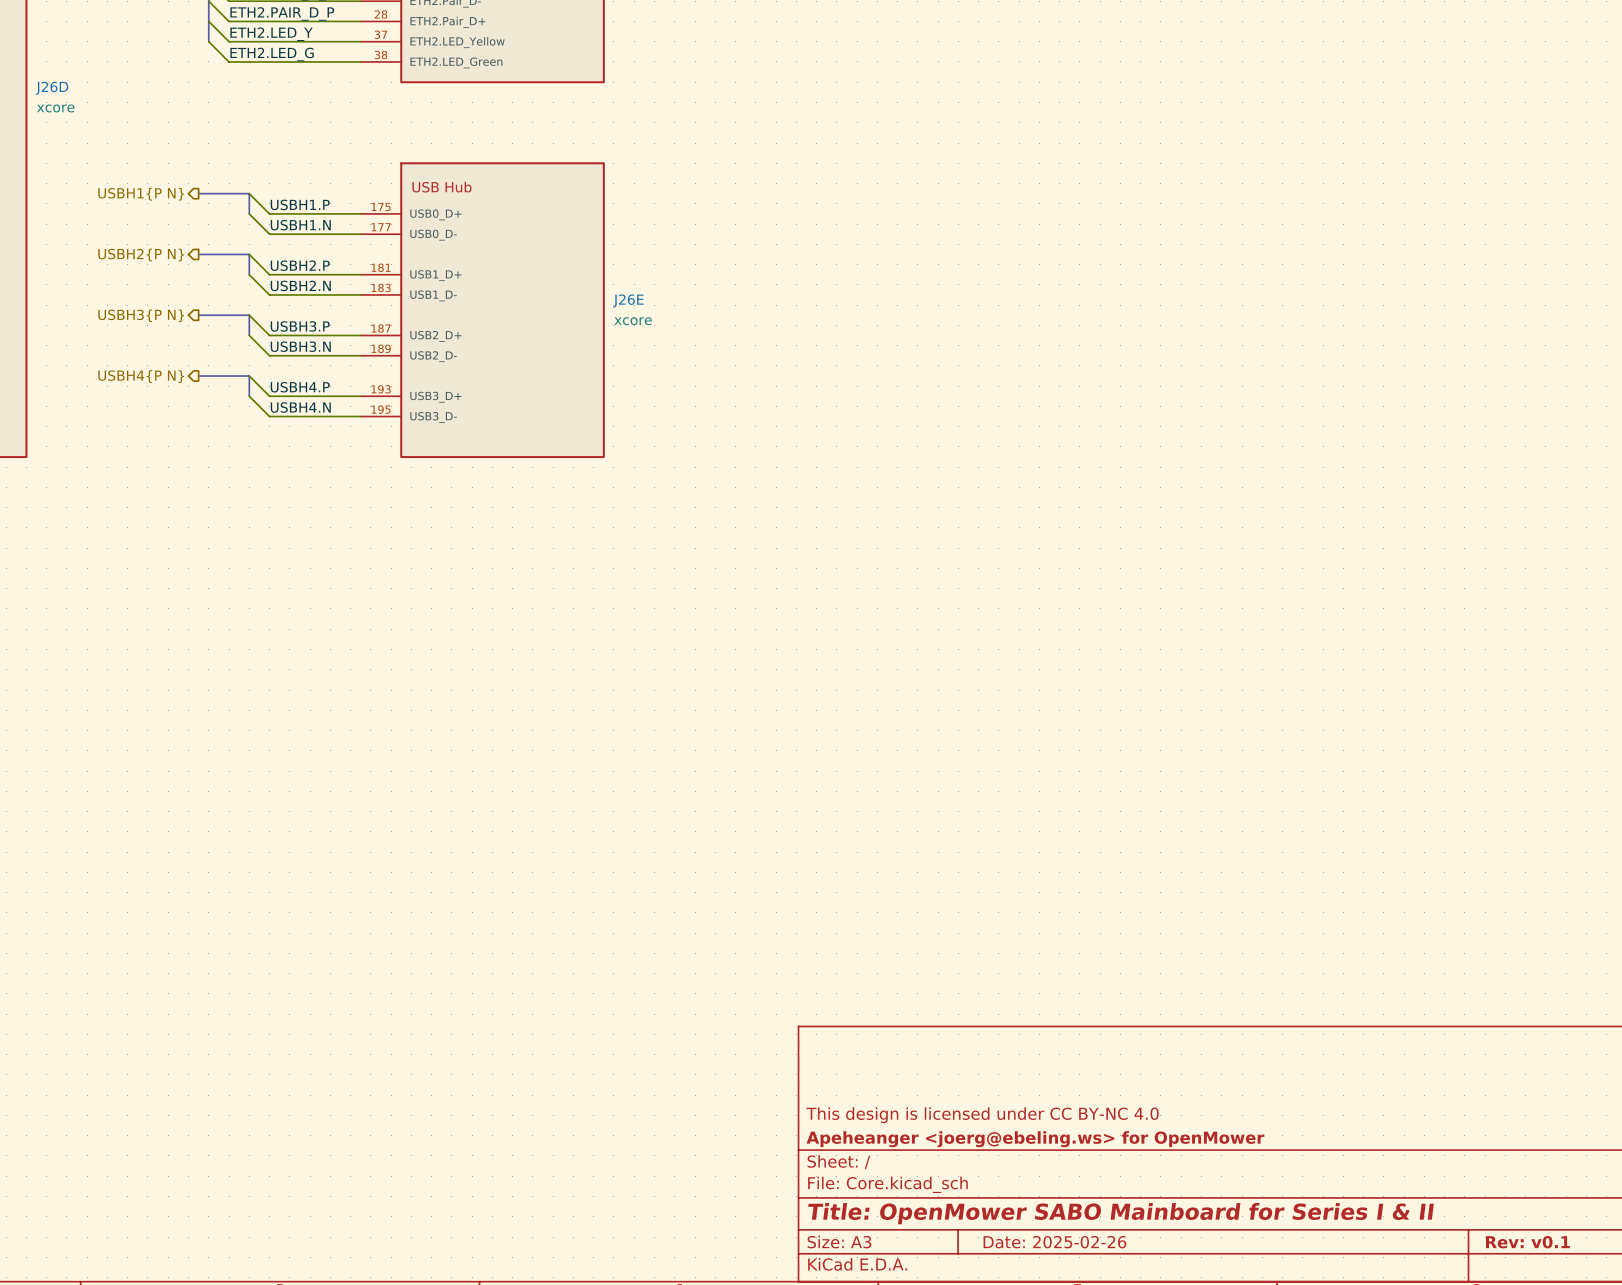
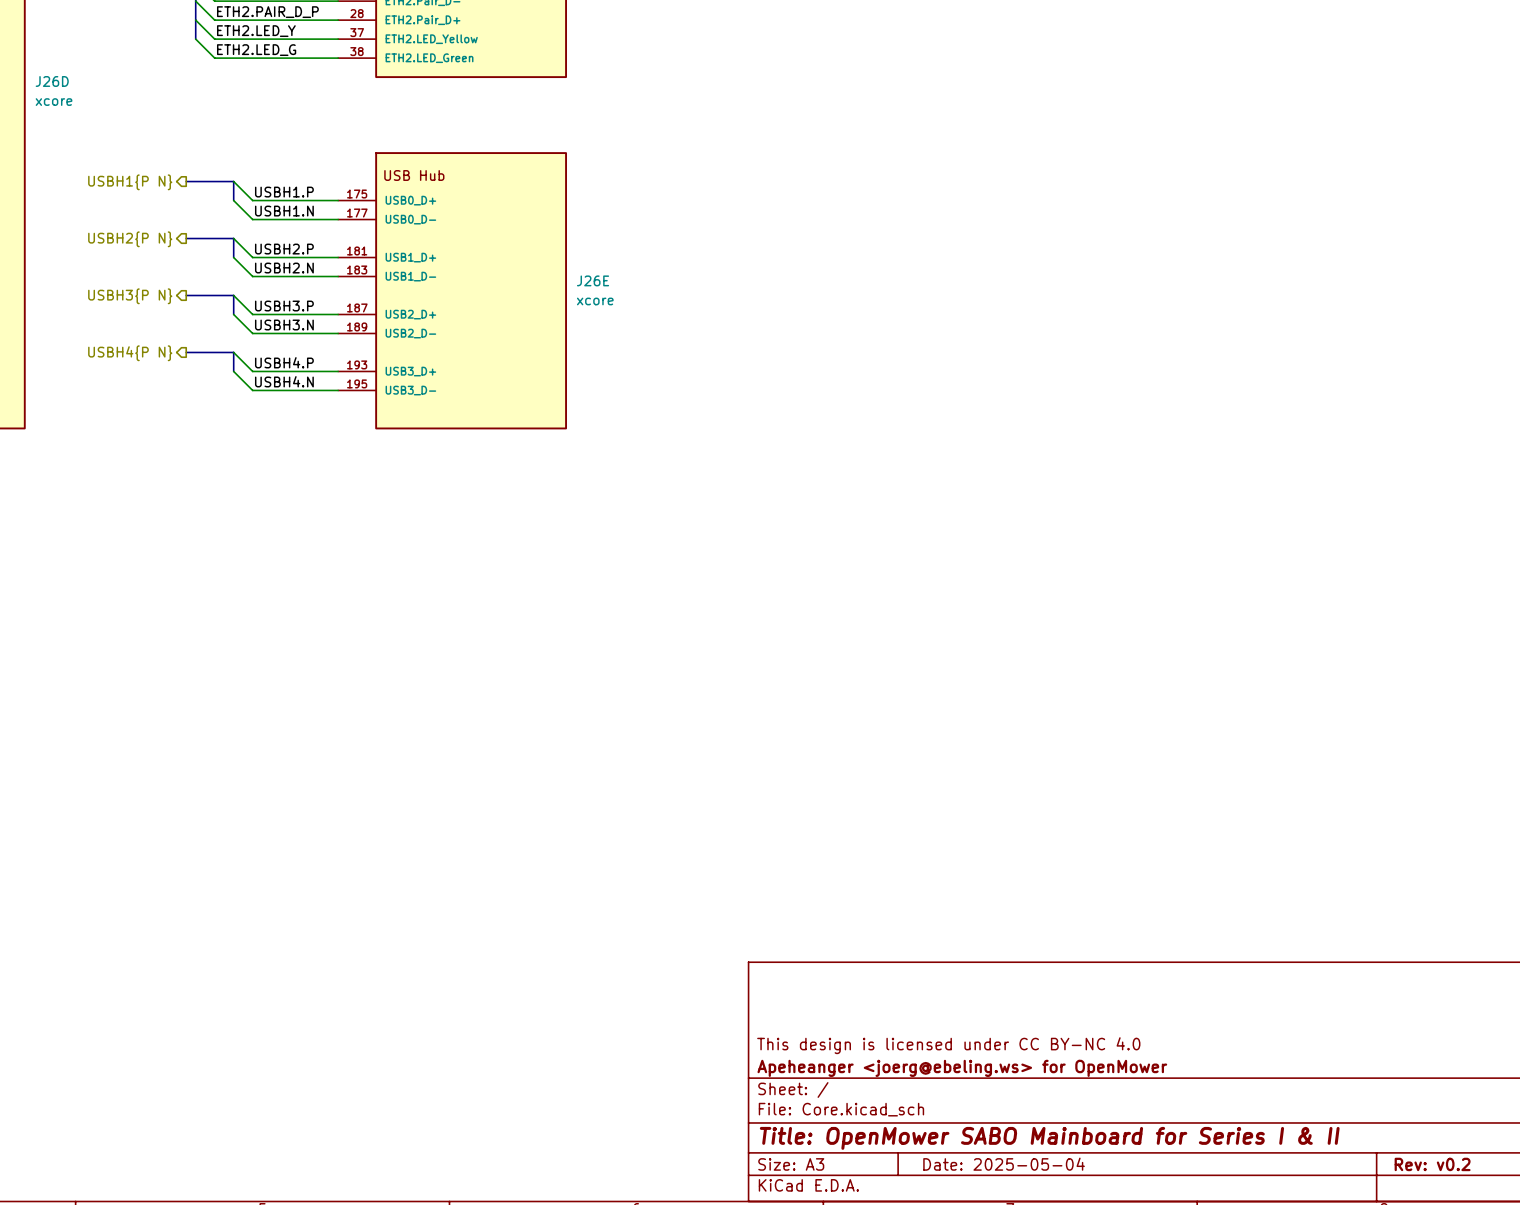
title block: Date: 2025-02-26 (1054, 1242) -> Date: 2025-05-04 (1004, 1164)
title block: Rev: v0.1 (1527, 1242) -> Rev: v0.2 (1432, 1164)

